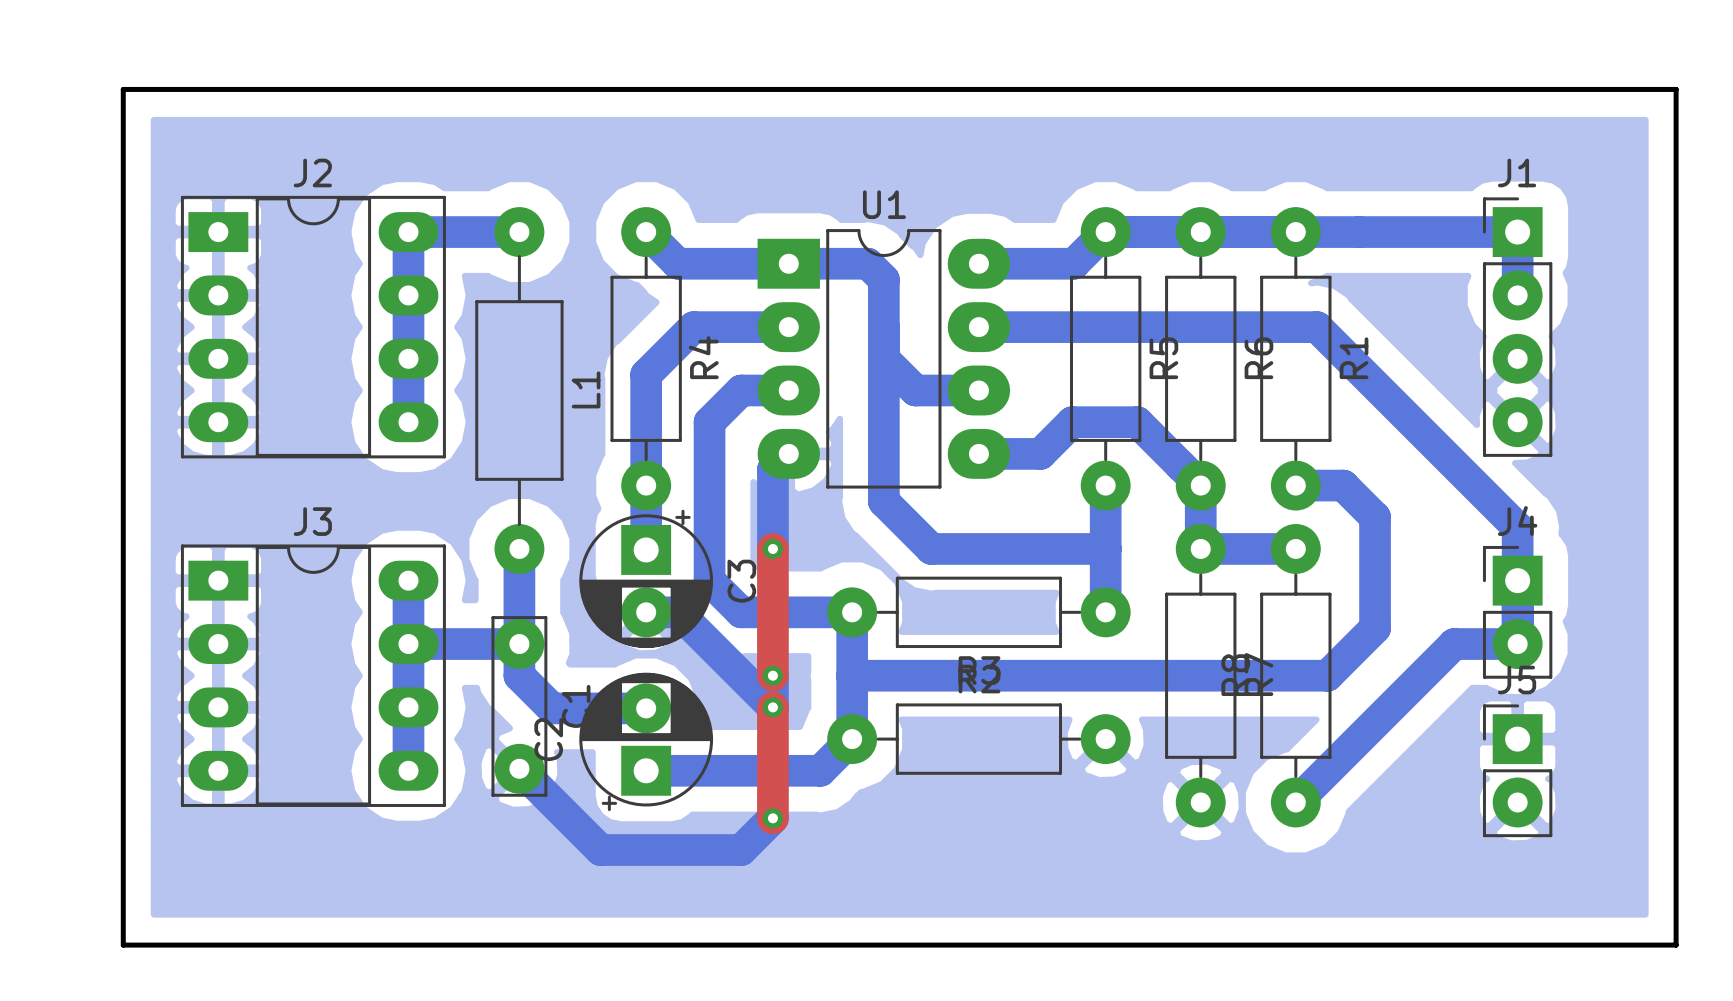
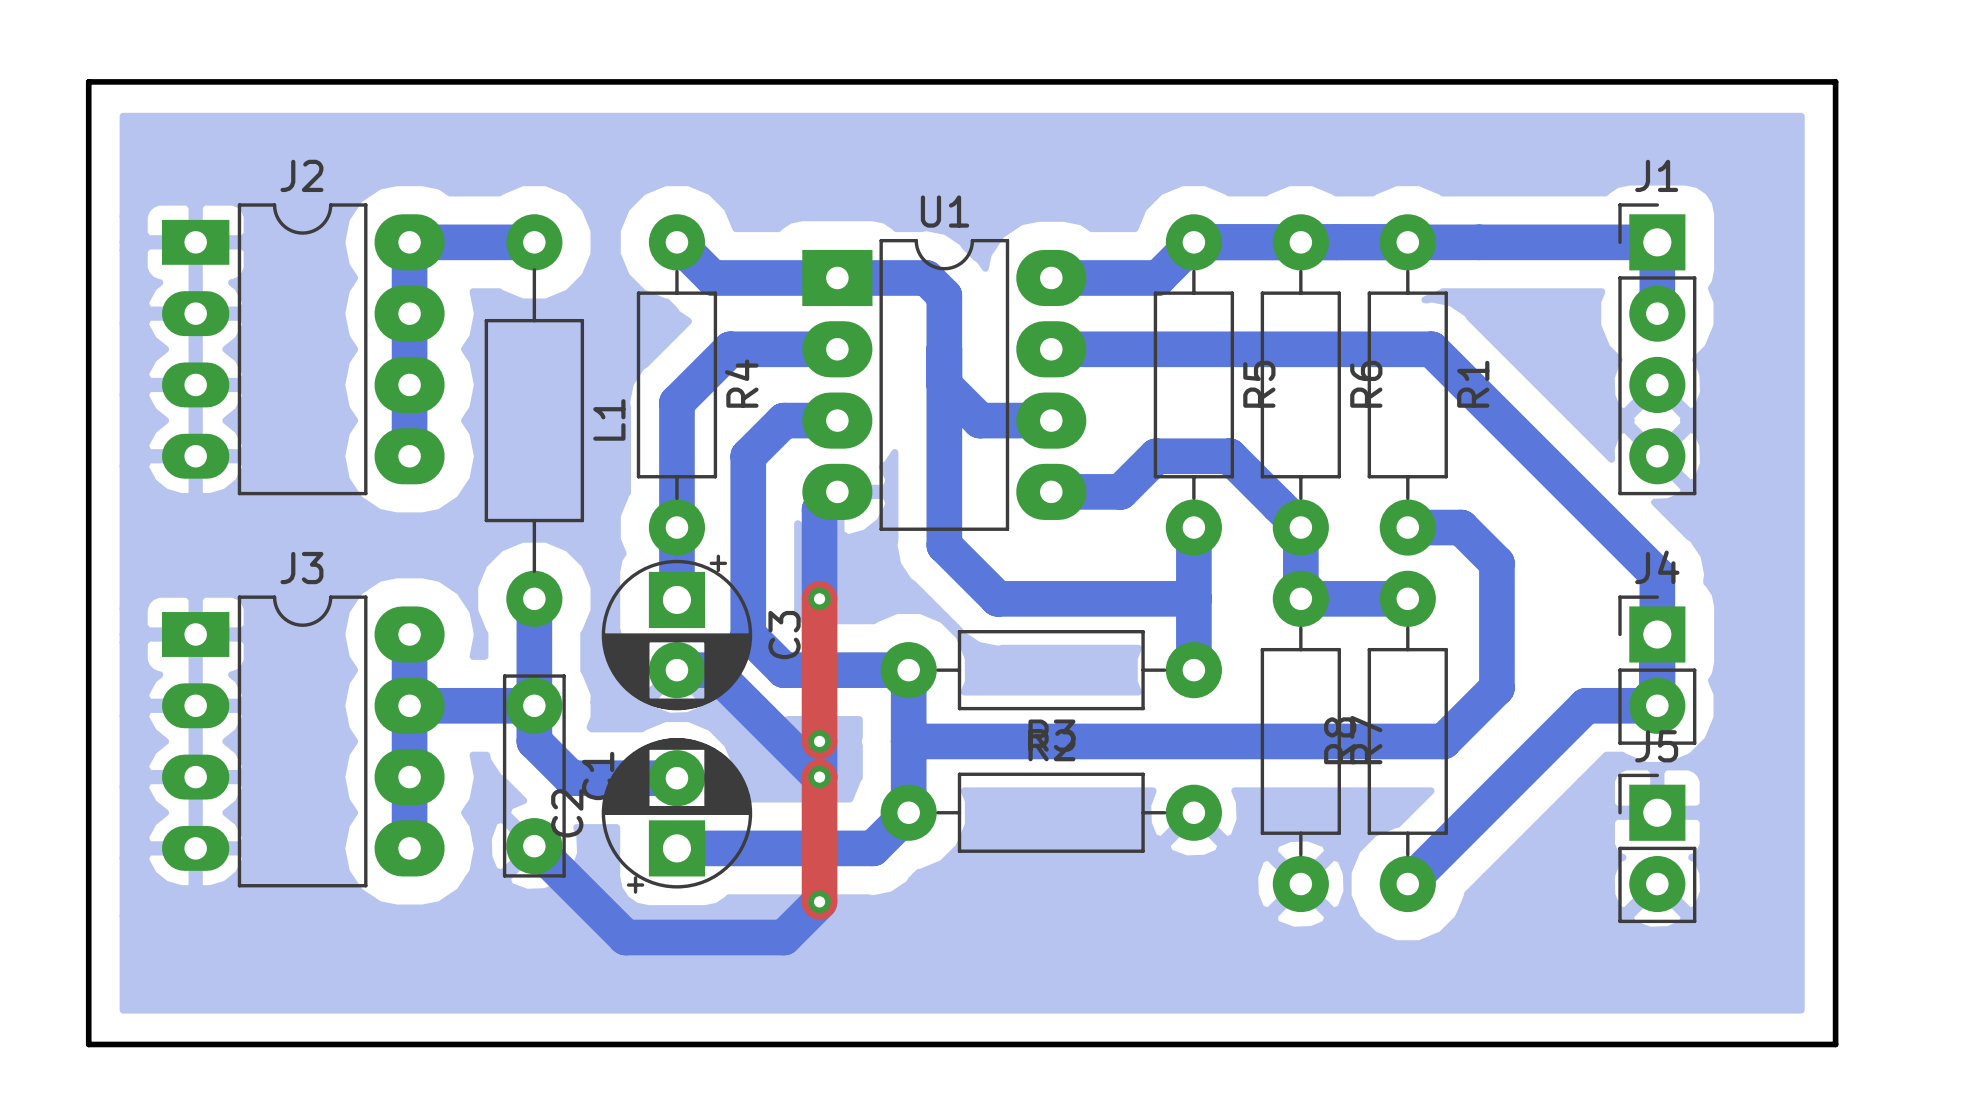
J2 footprint: [180, 195, 446, 459] -> [161, 203, 445, 496]
J3 footprint: [180, 544, 446, 807] -> [161, 595, 445, 888]

